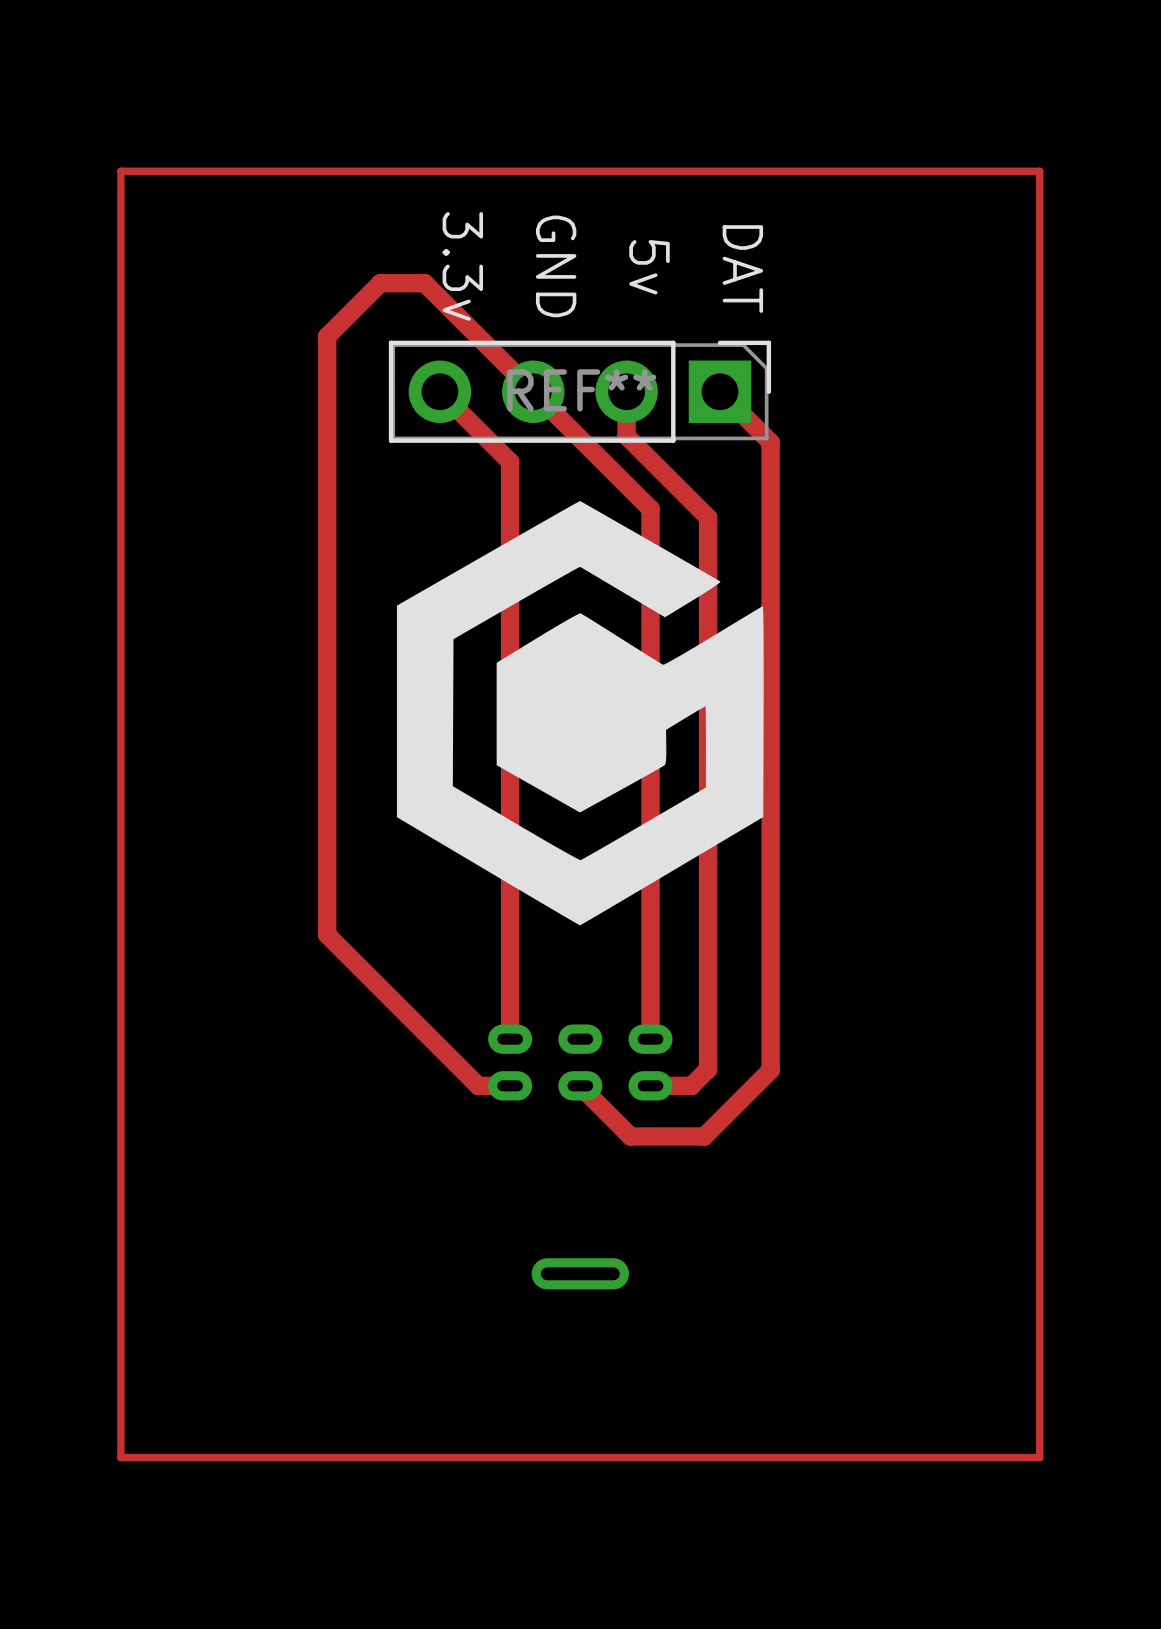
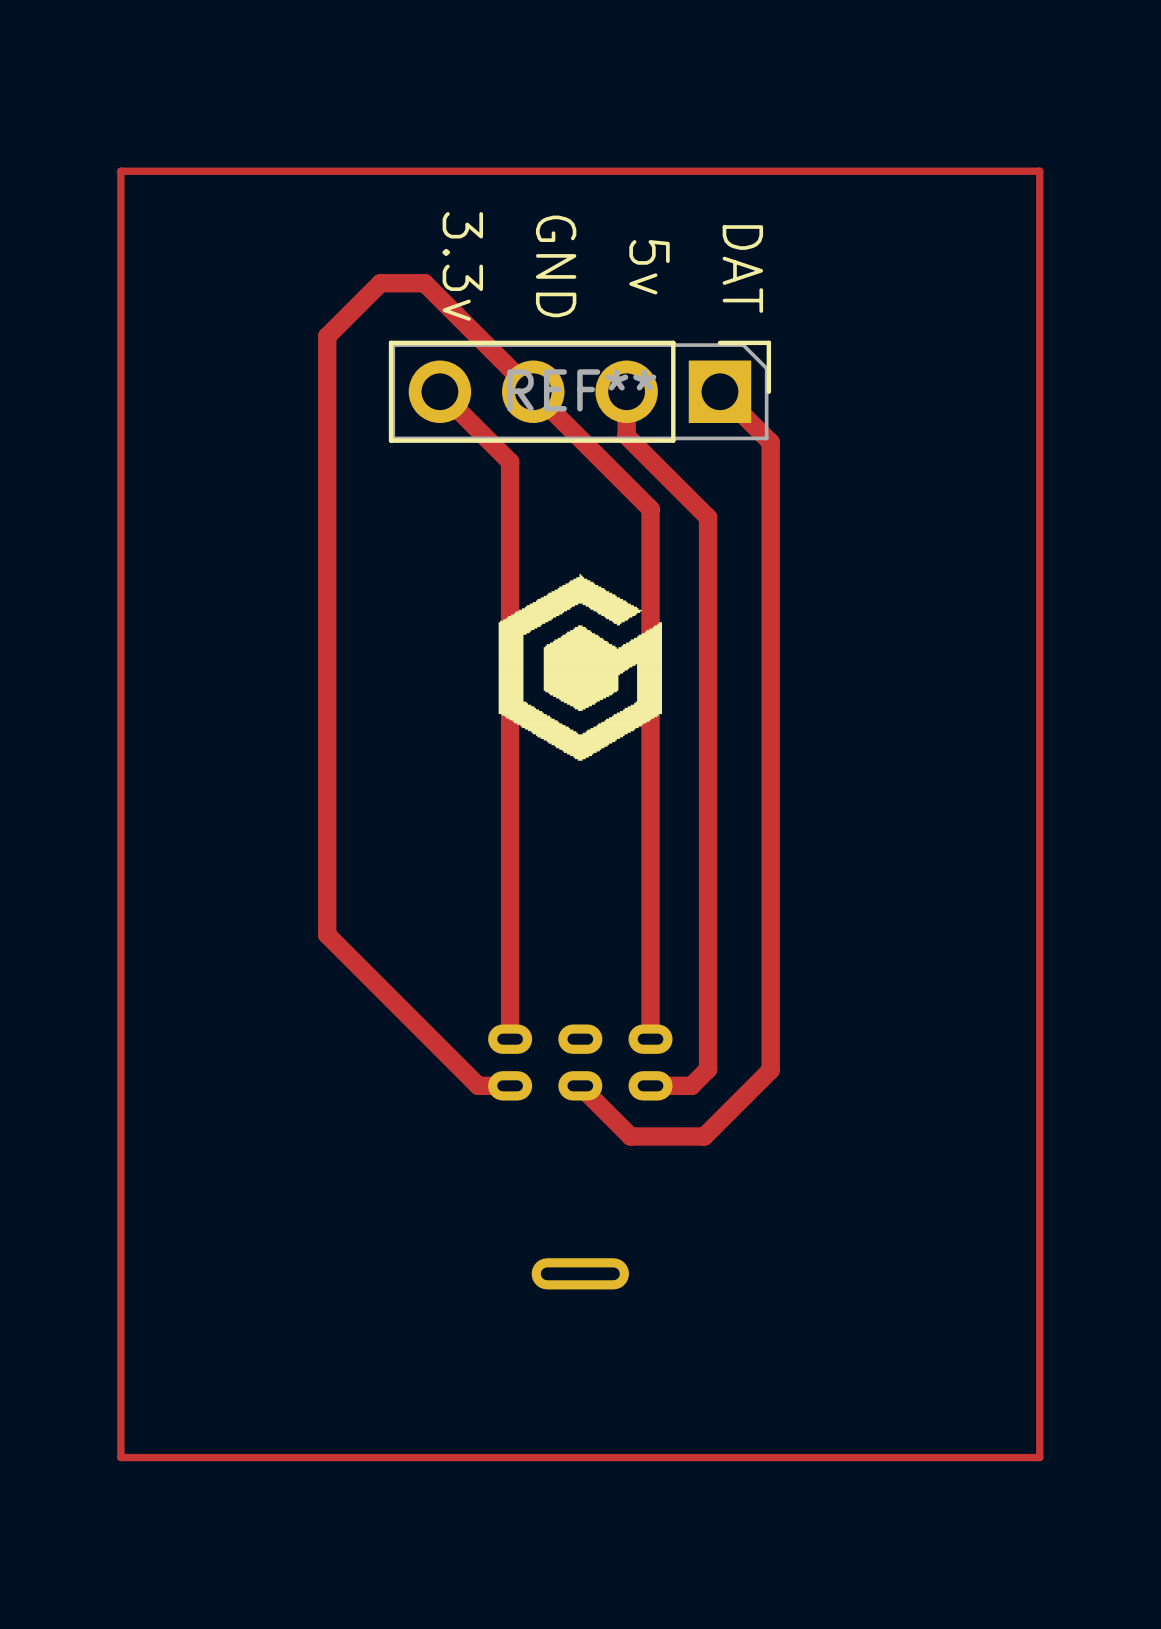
drawing: [396, 501, 764, 926] -> none
drawing: none -> [498, 574, 663, 761]

